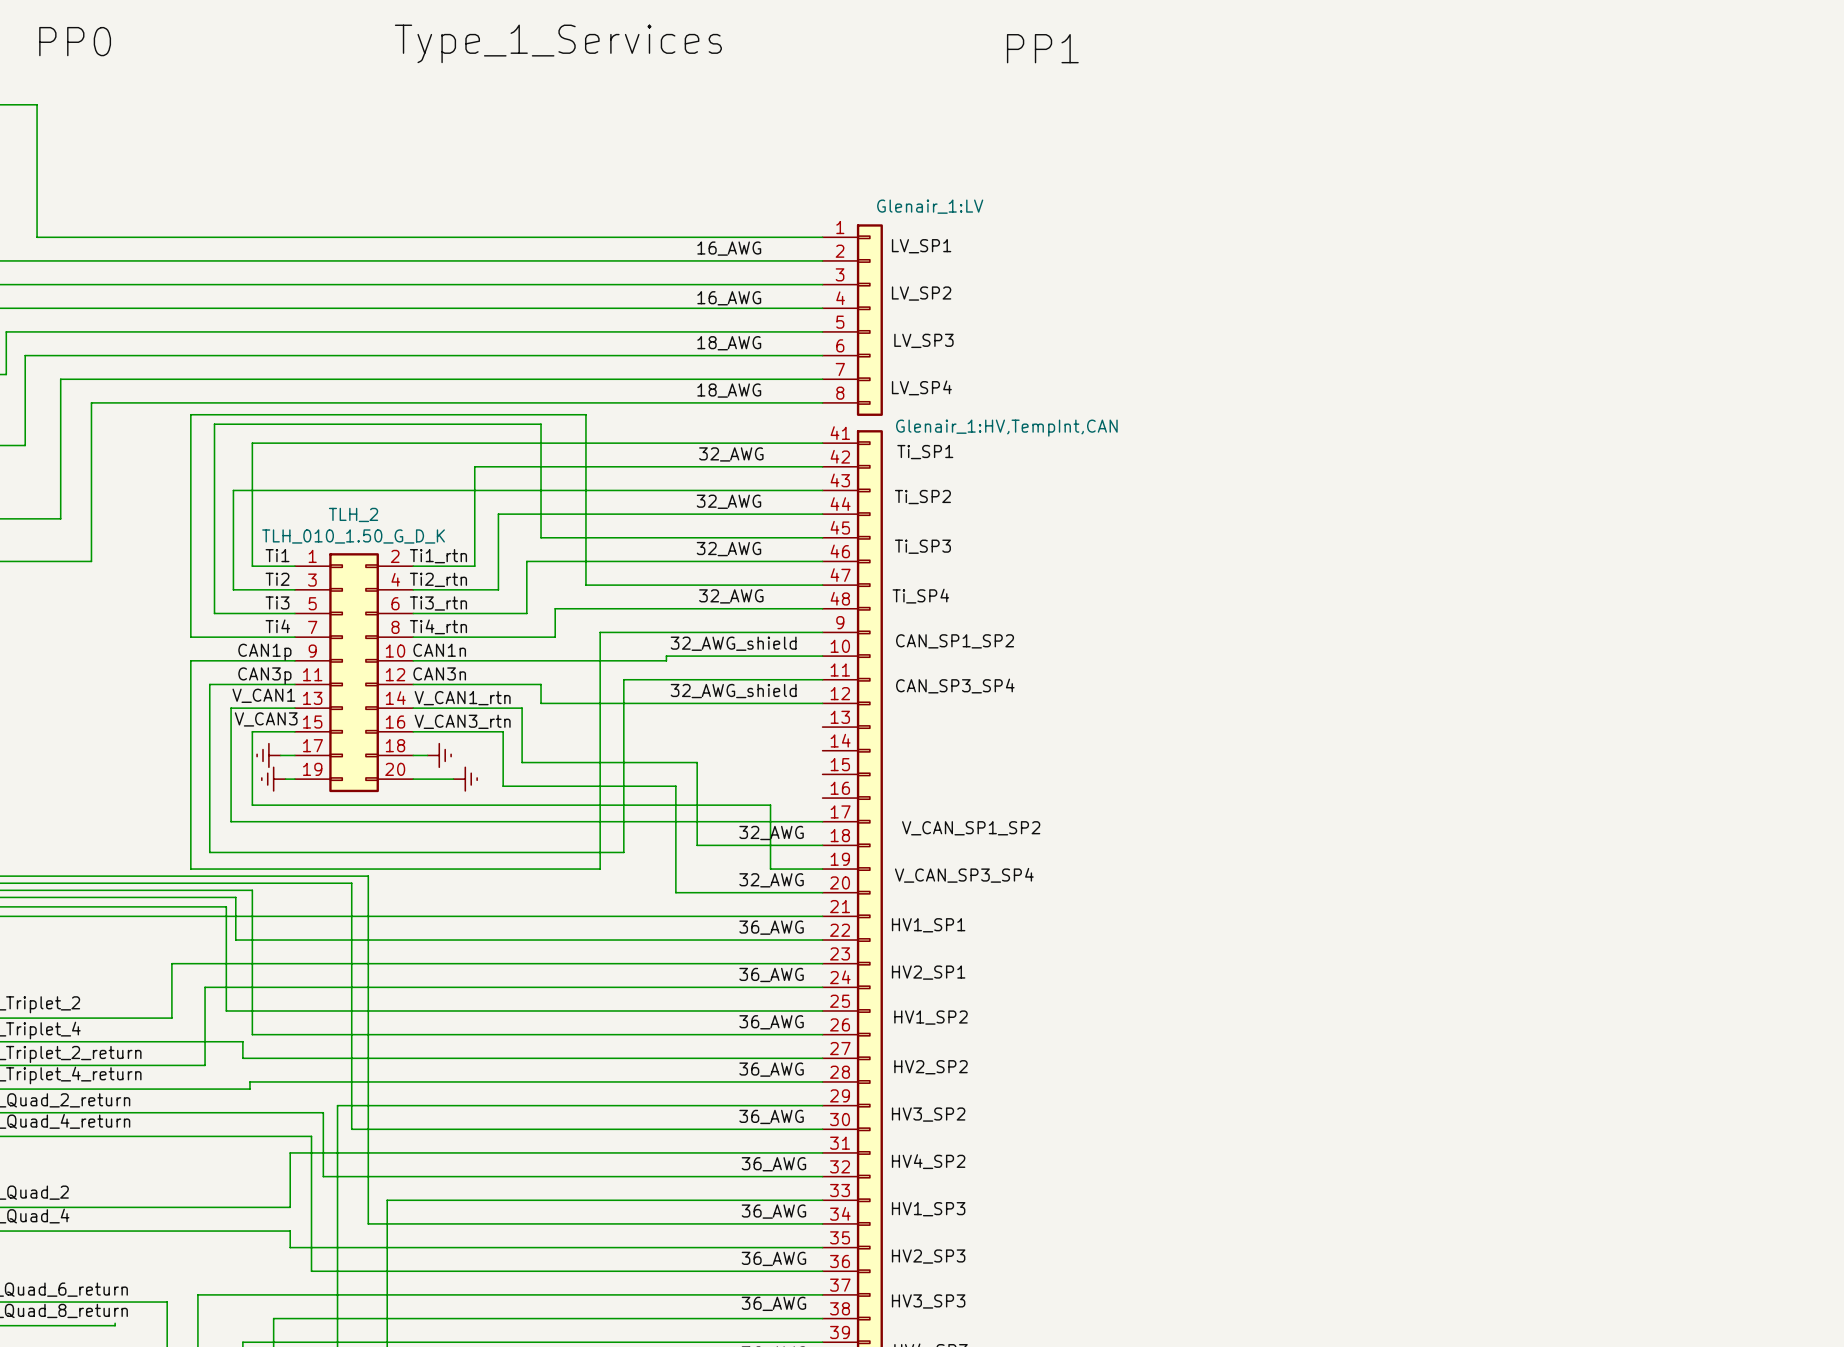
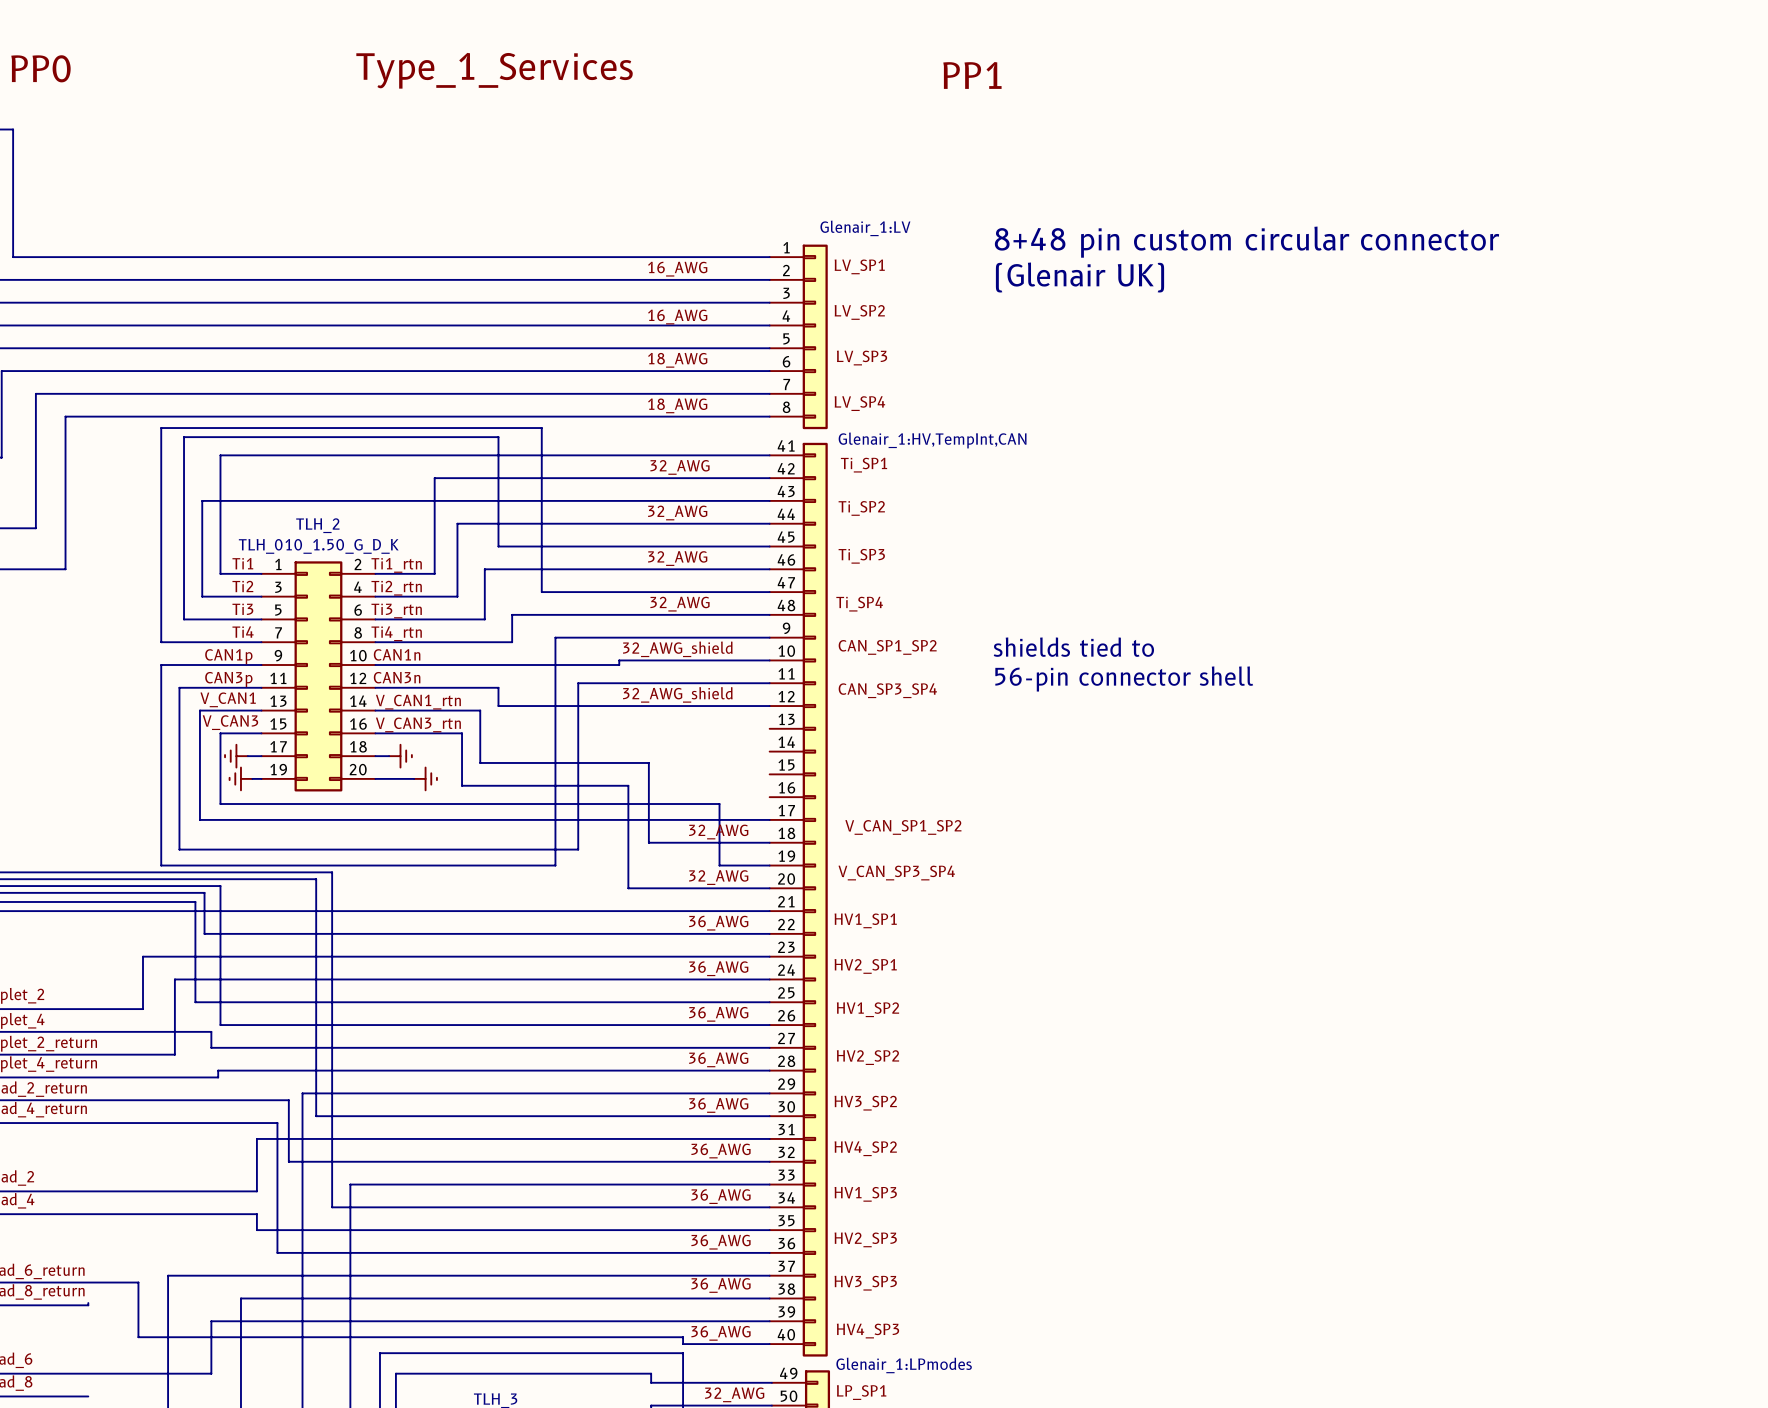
text: none -> 8+48 pin custom circular connector (1246, 242)
text: none -> (Glenair UK) (1080, 277)
text: none -> shields tied to (1073, 647)
text: none -> 56-pin connector shell (1124, 678)

